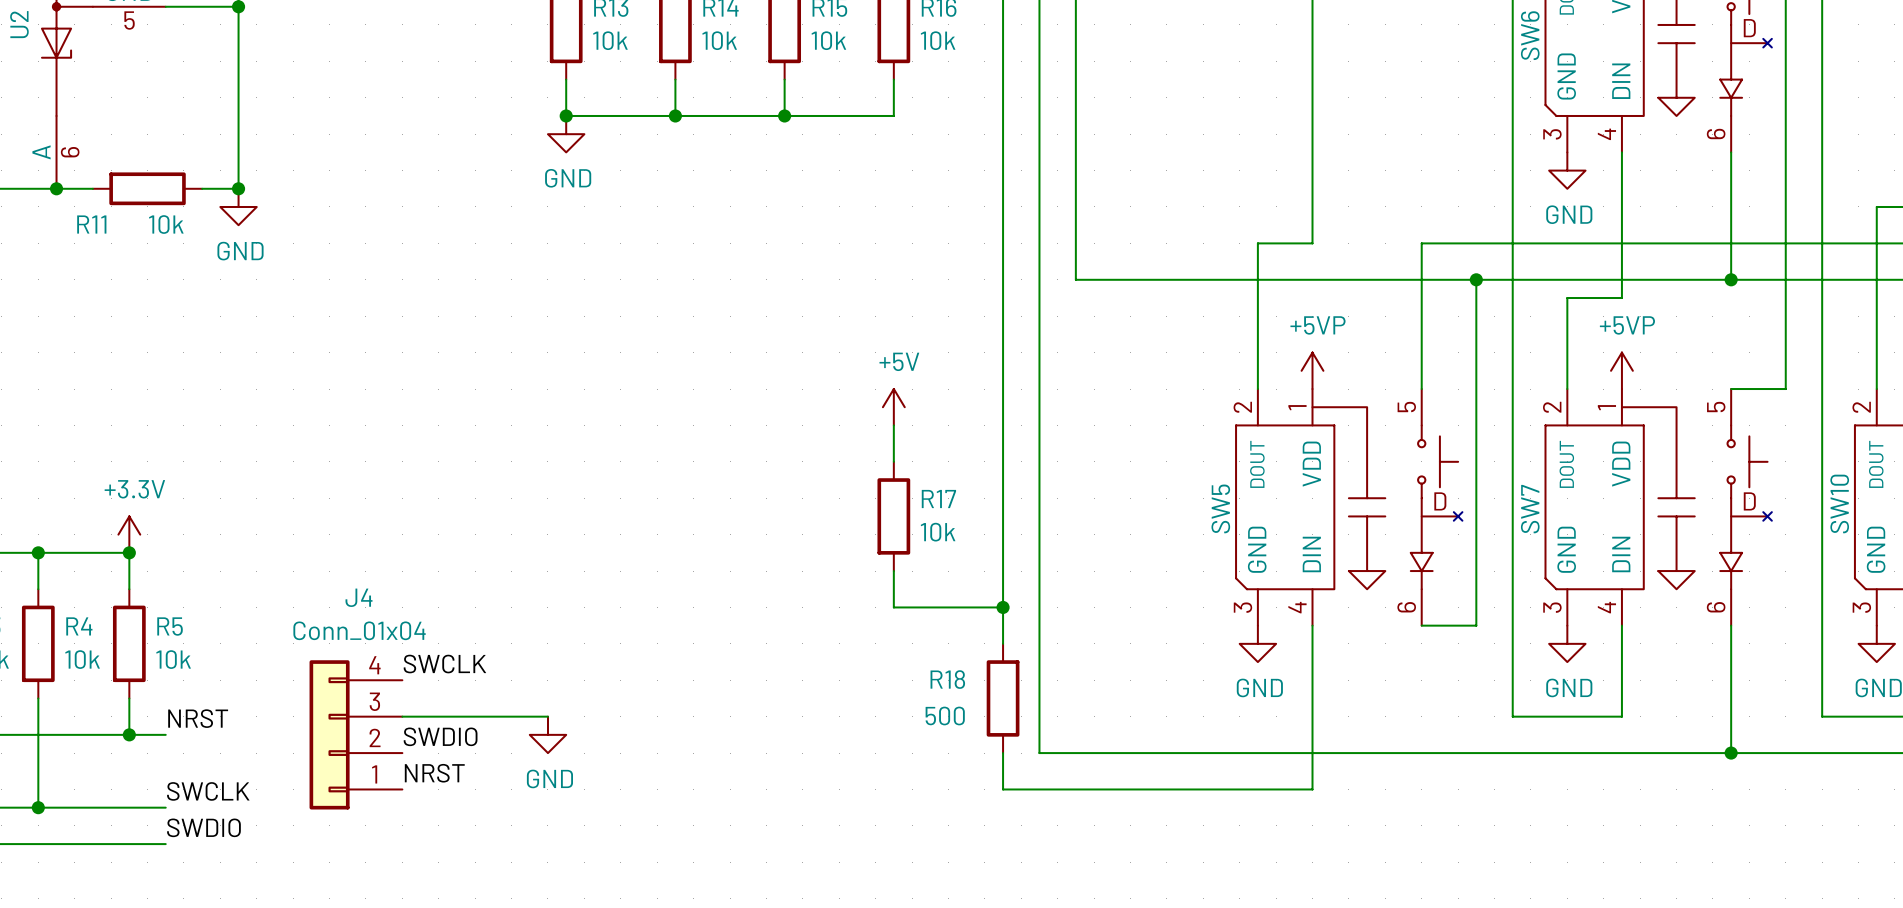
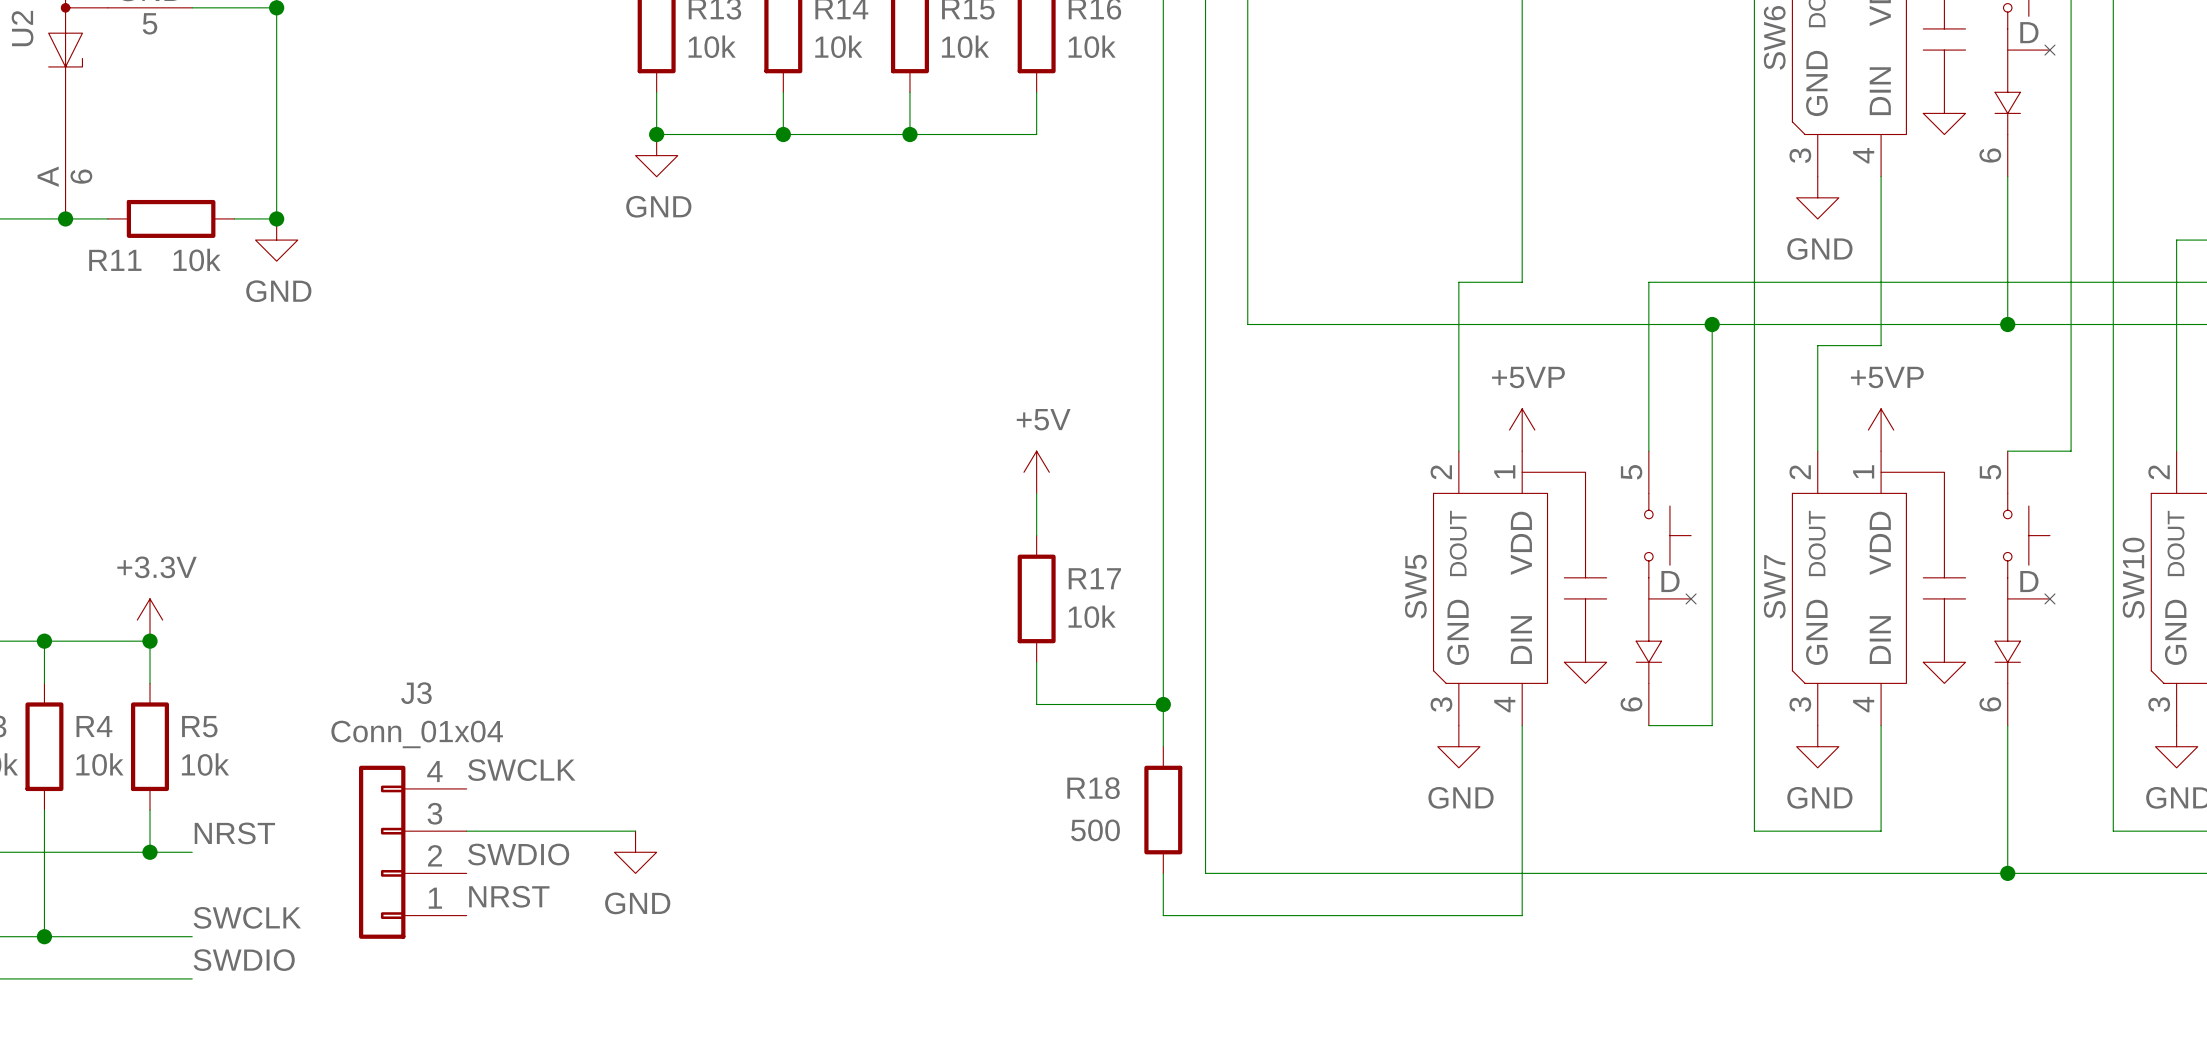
J4 name: J4 (359, 597) -> J3 (416, 693)

